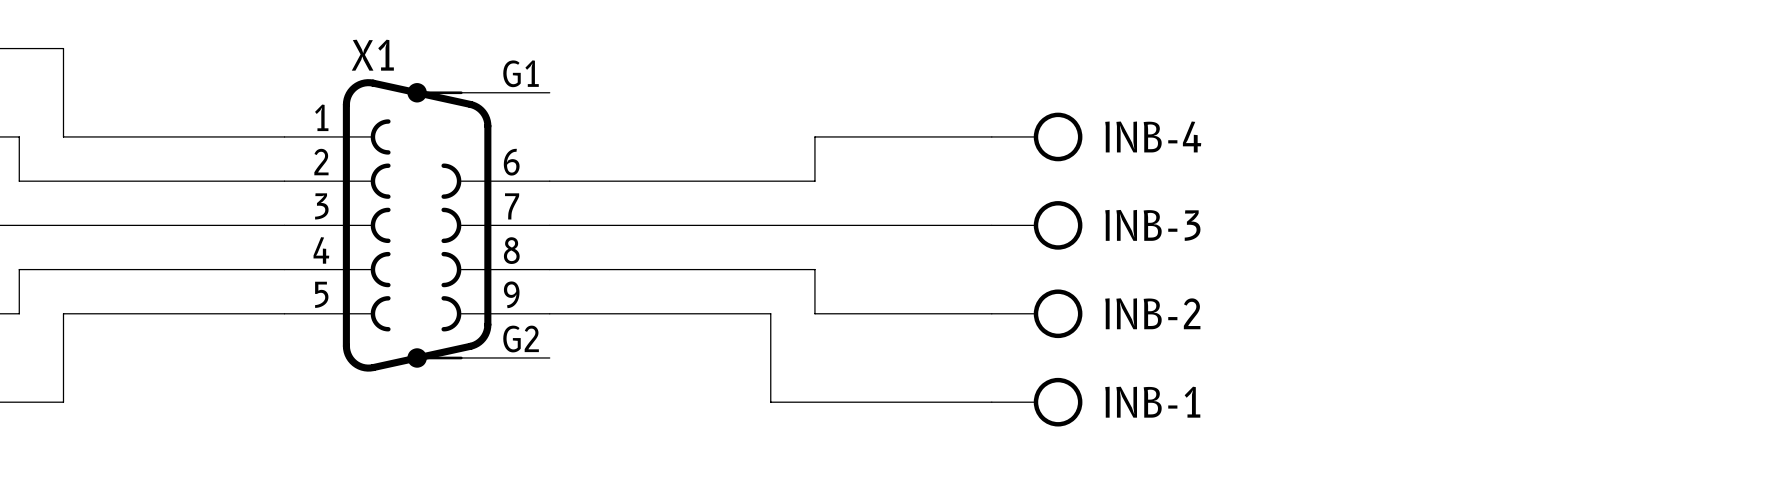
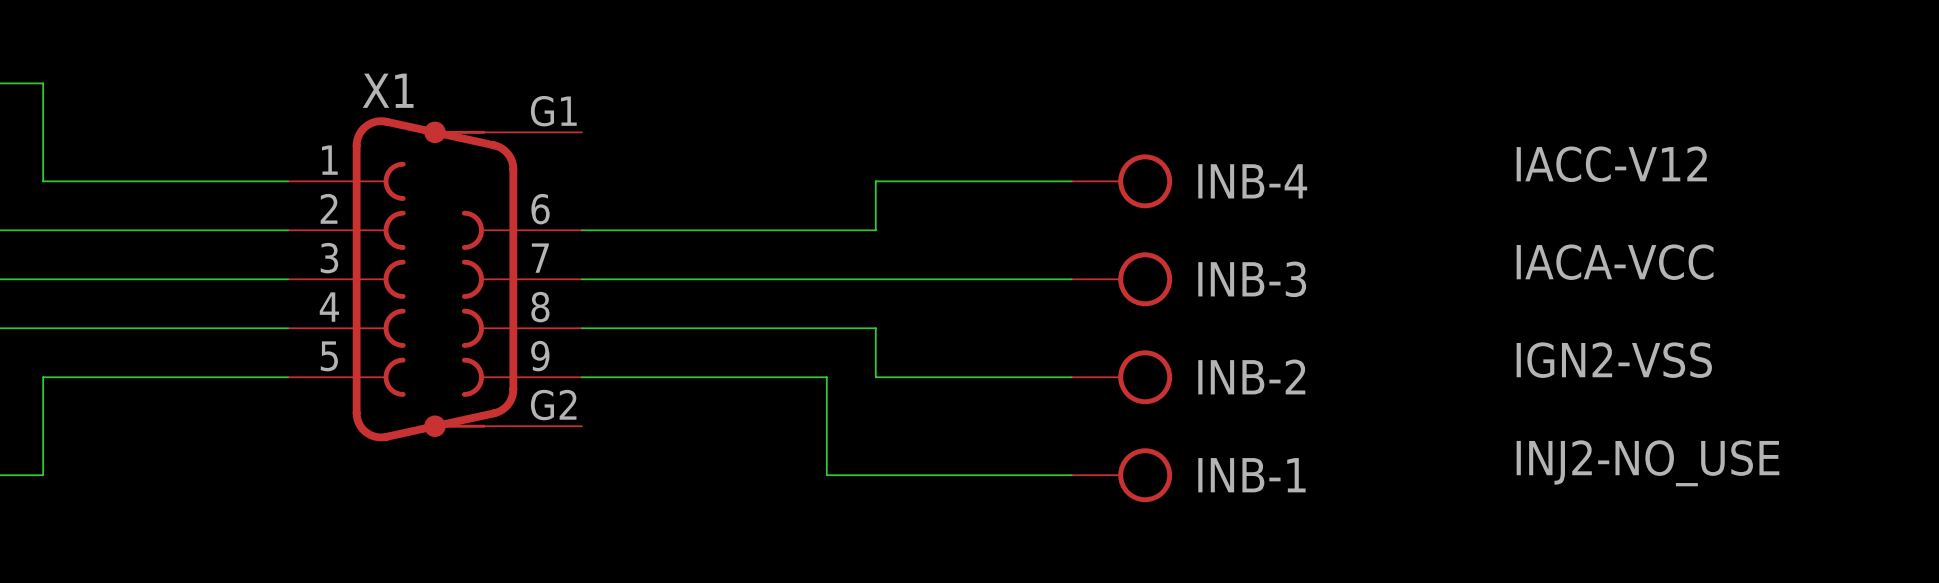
label: none -> IACC-V12 (1611, 164)
label: none -> IACA-VCC (1615, 262)
label: none -> IGN2-VSS (1614, 360)
label: none -> INJ2-NO_USE (1647, 463)

